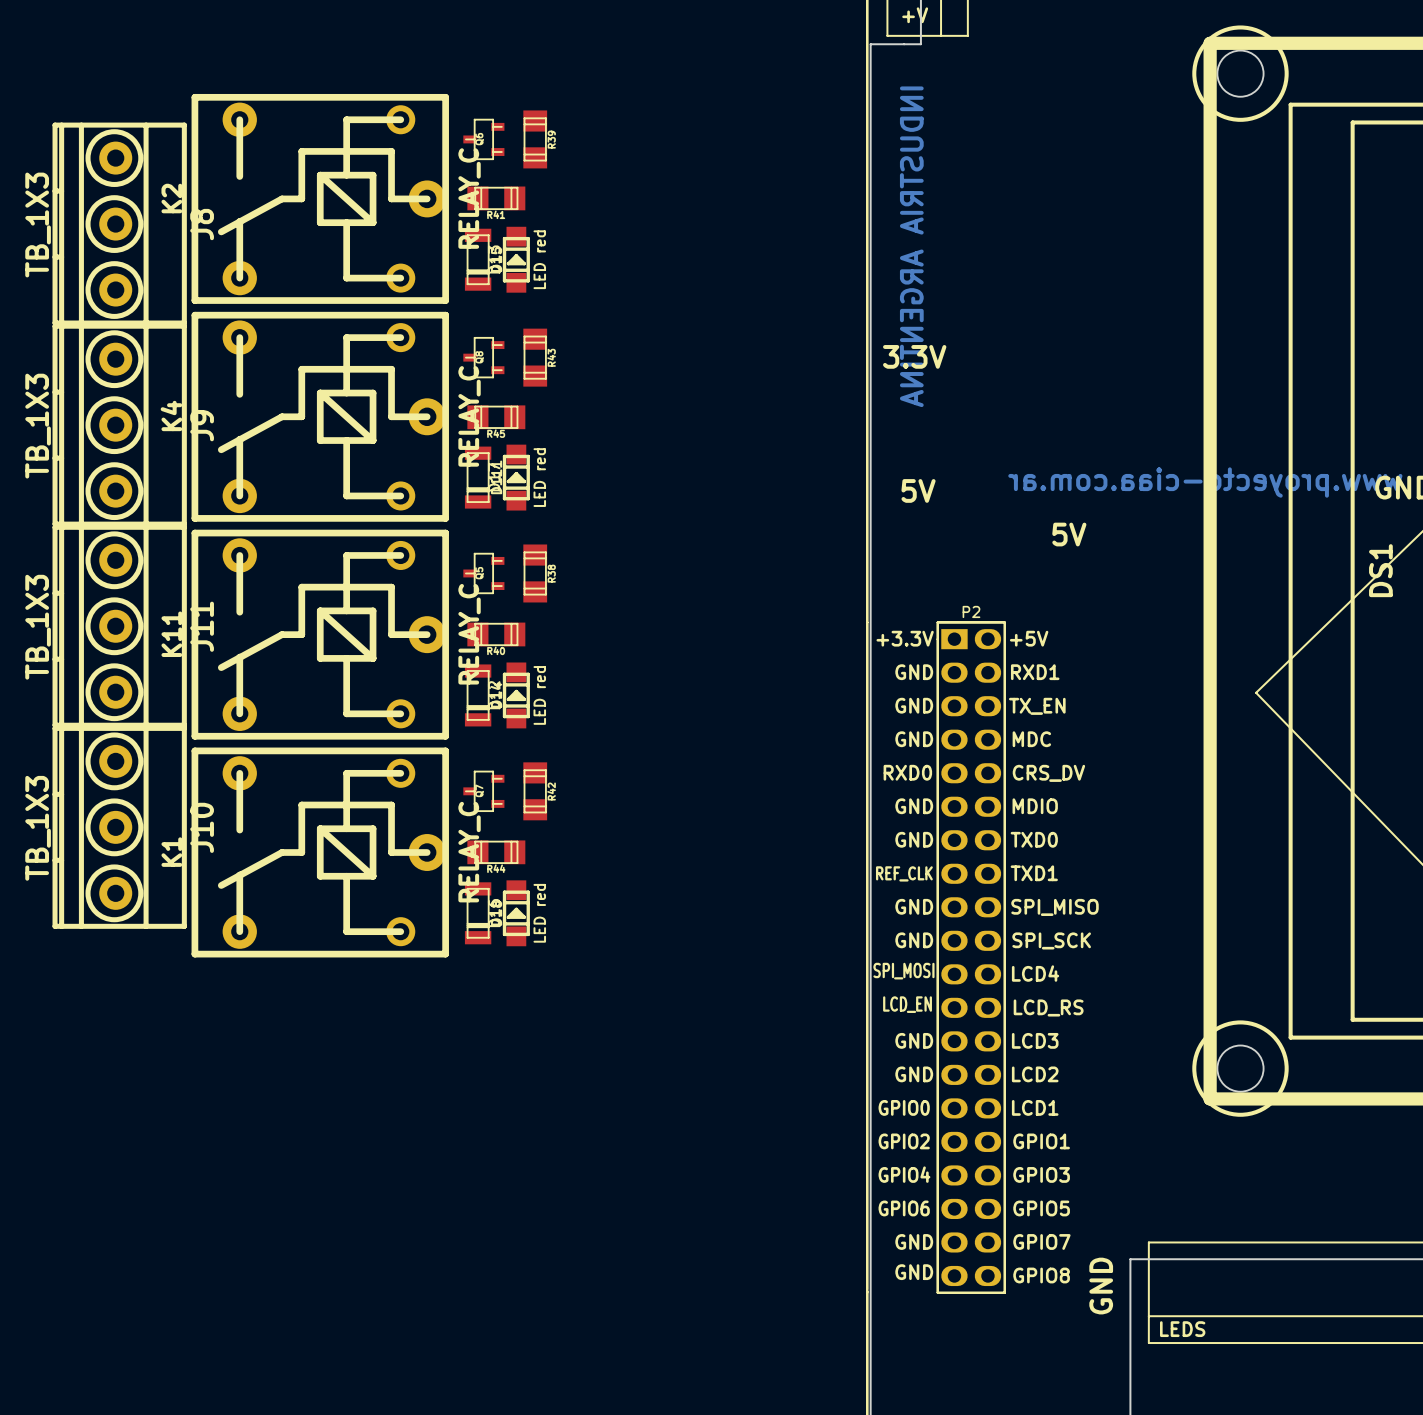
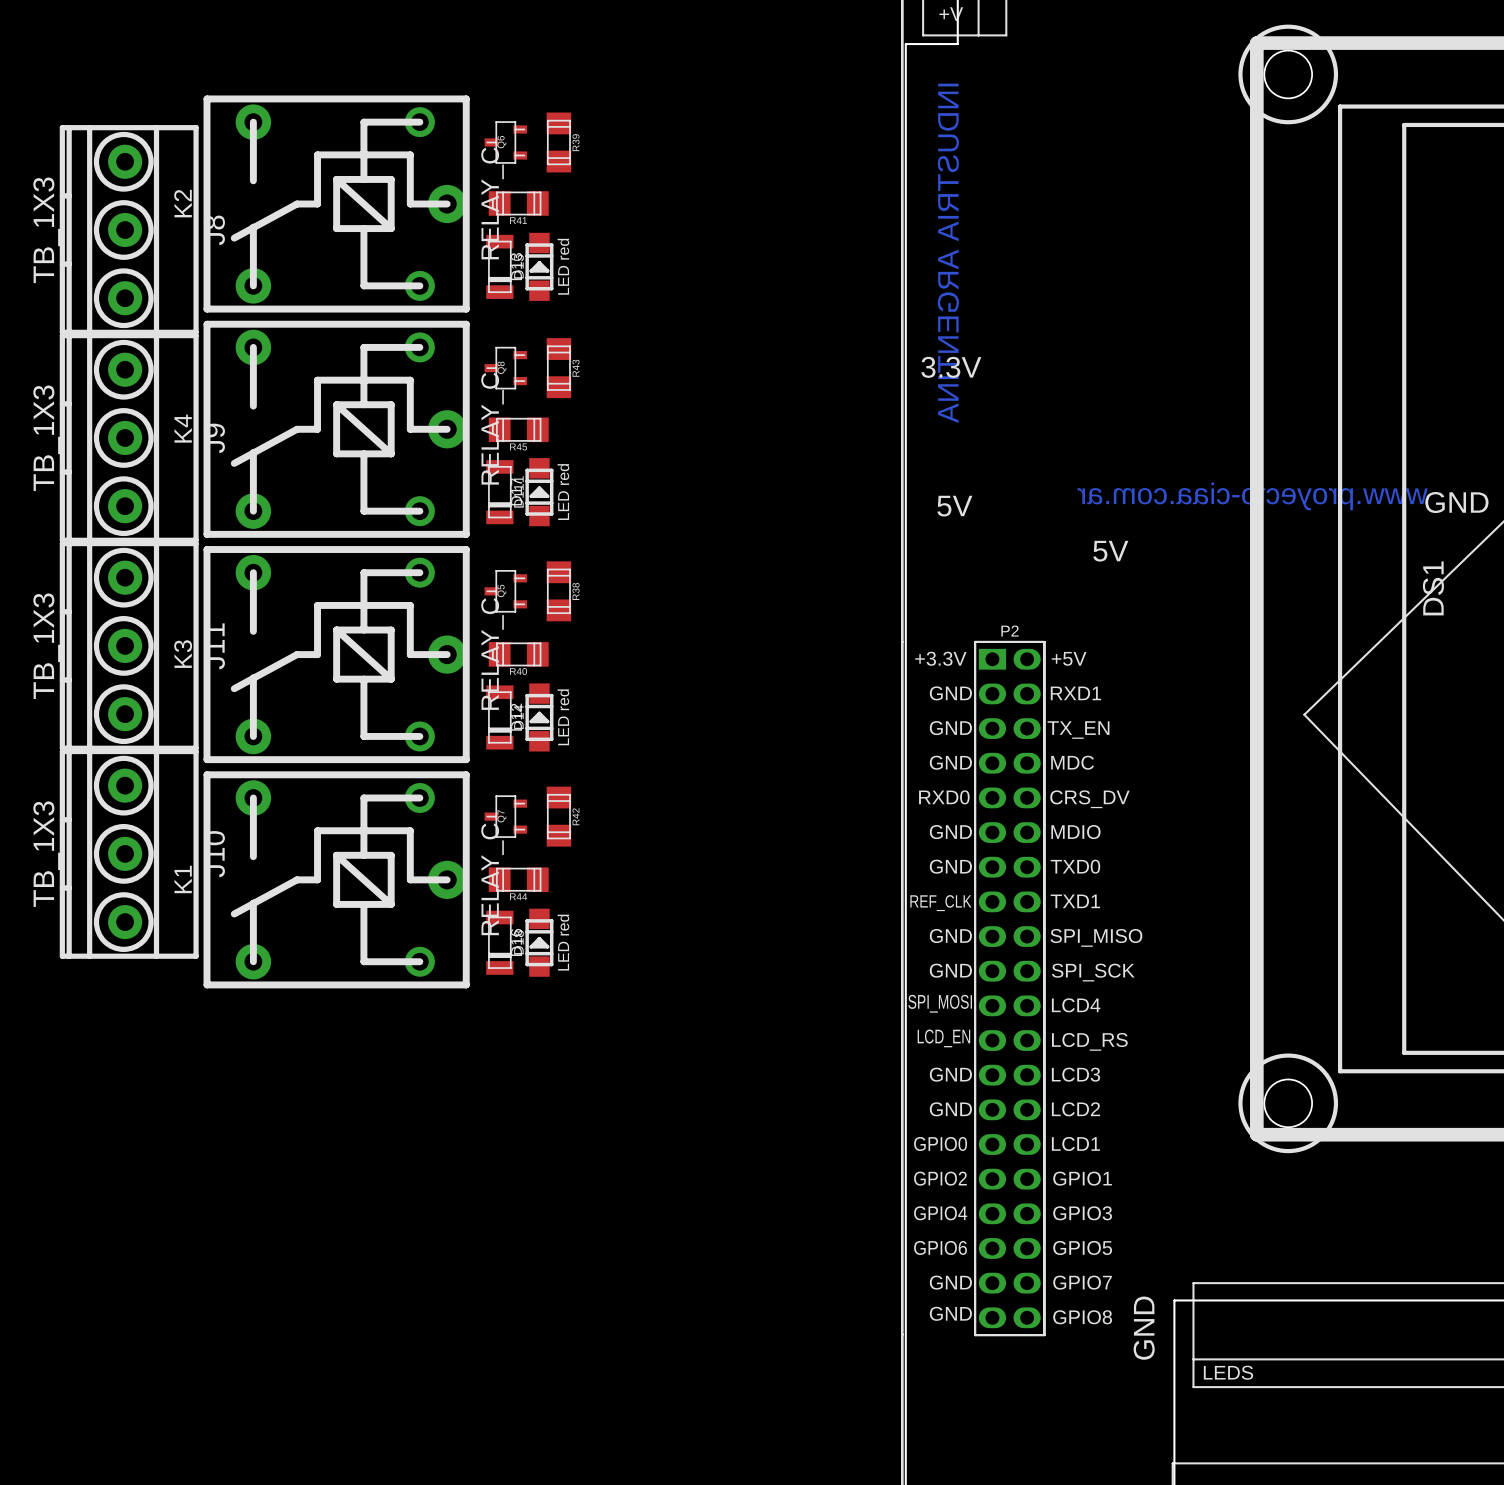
K11 name: K11 (171, 634) -> K3 (183, 654)

